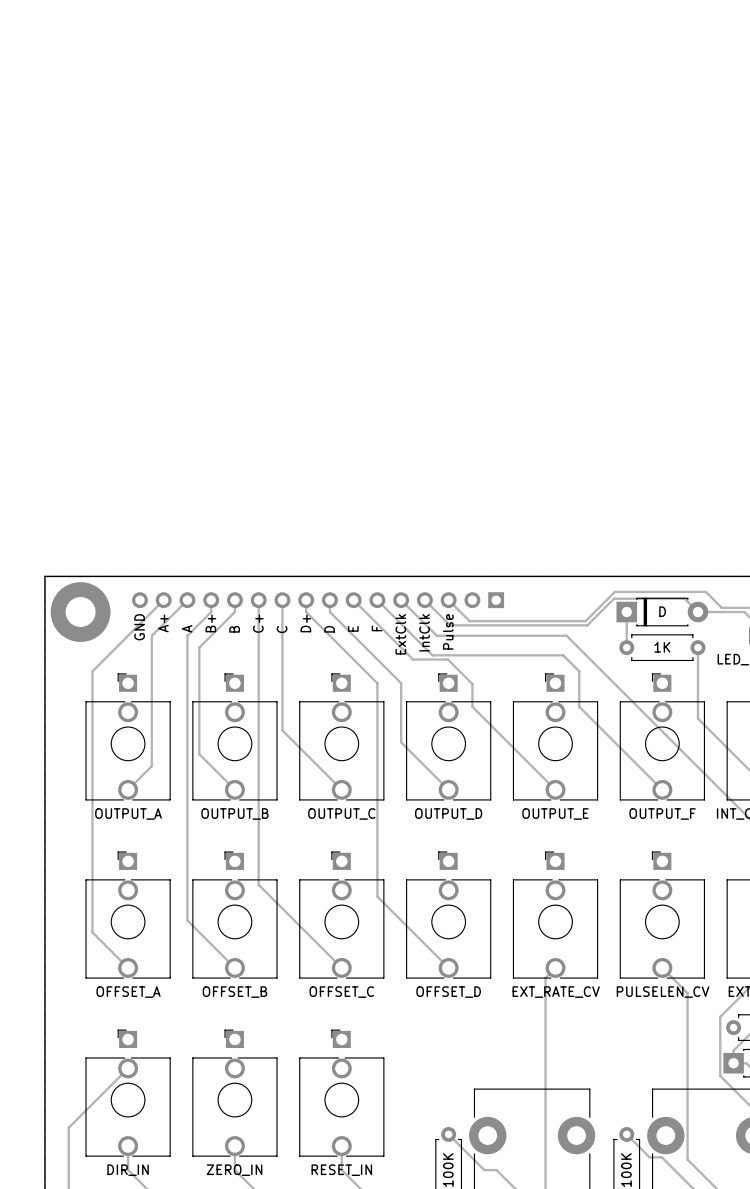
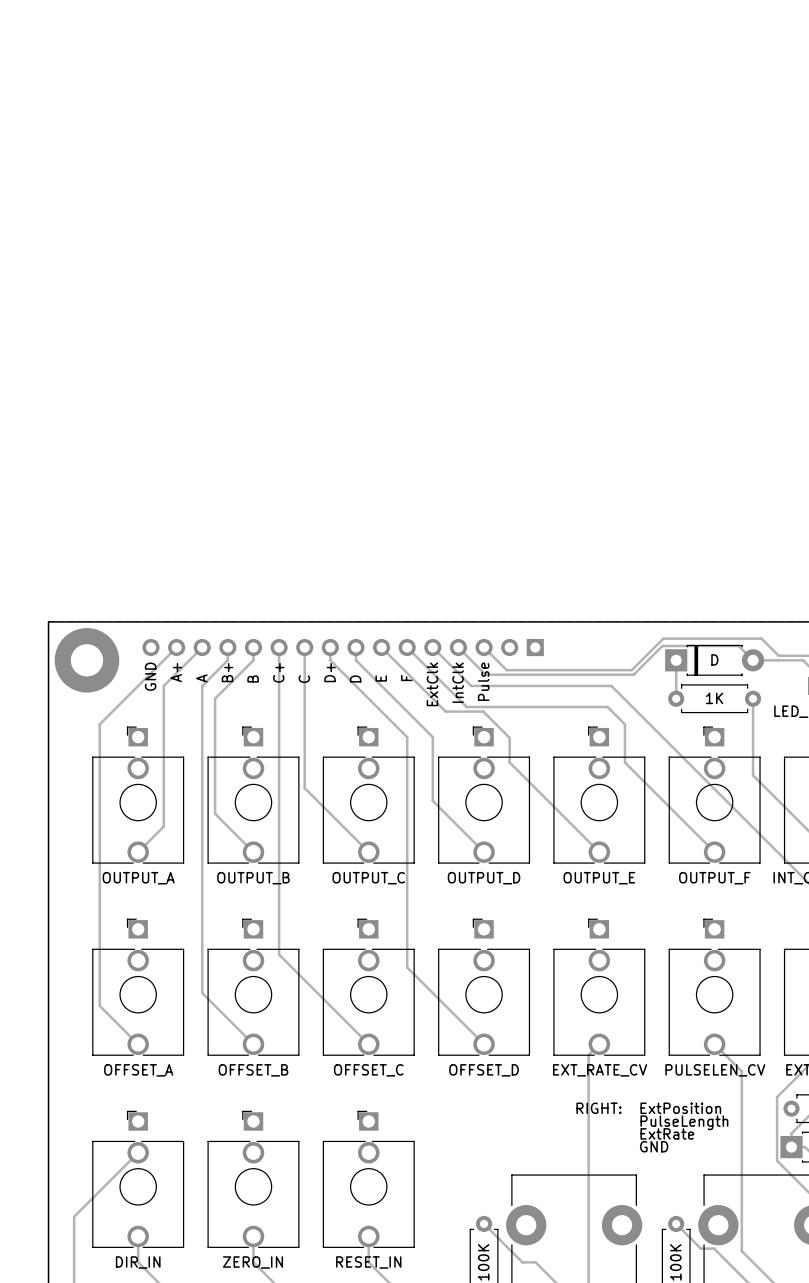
text: none -> RIGHT: (598, 1108)
text: none -> ExtPosition (680, 1108)
text: none -> PulseLength (684, 1122)
text: none -> ExtRate (667, 1133)
text: none -> GND (654, 1146)

